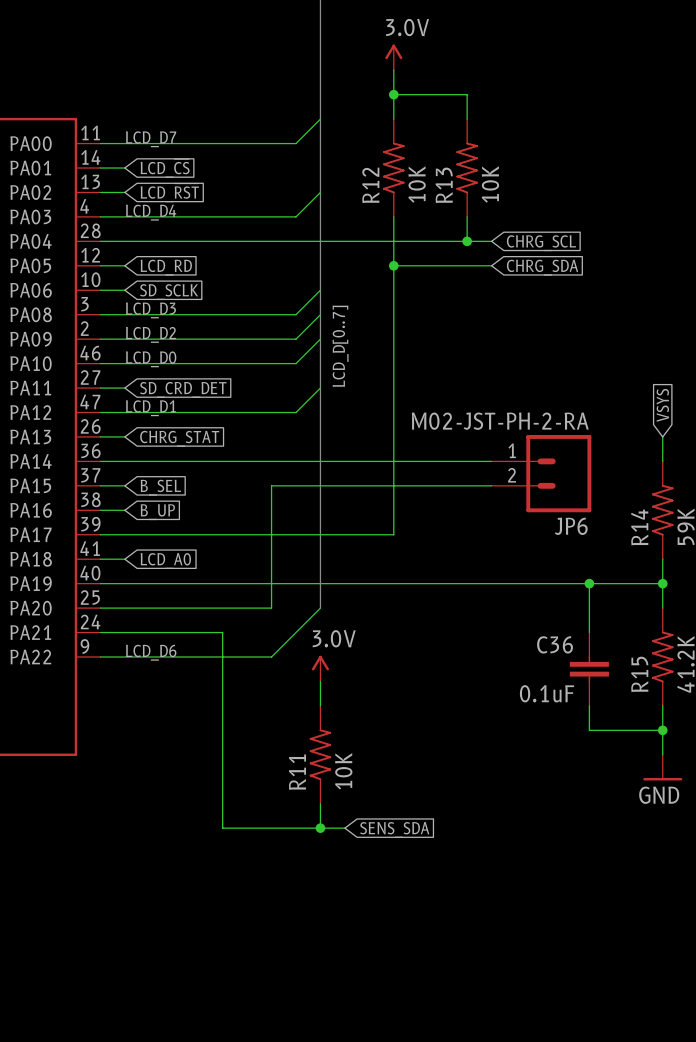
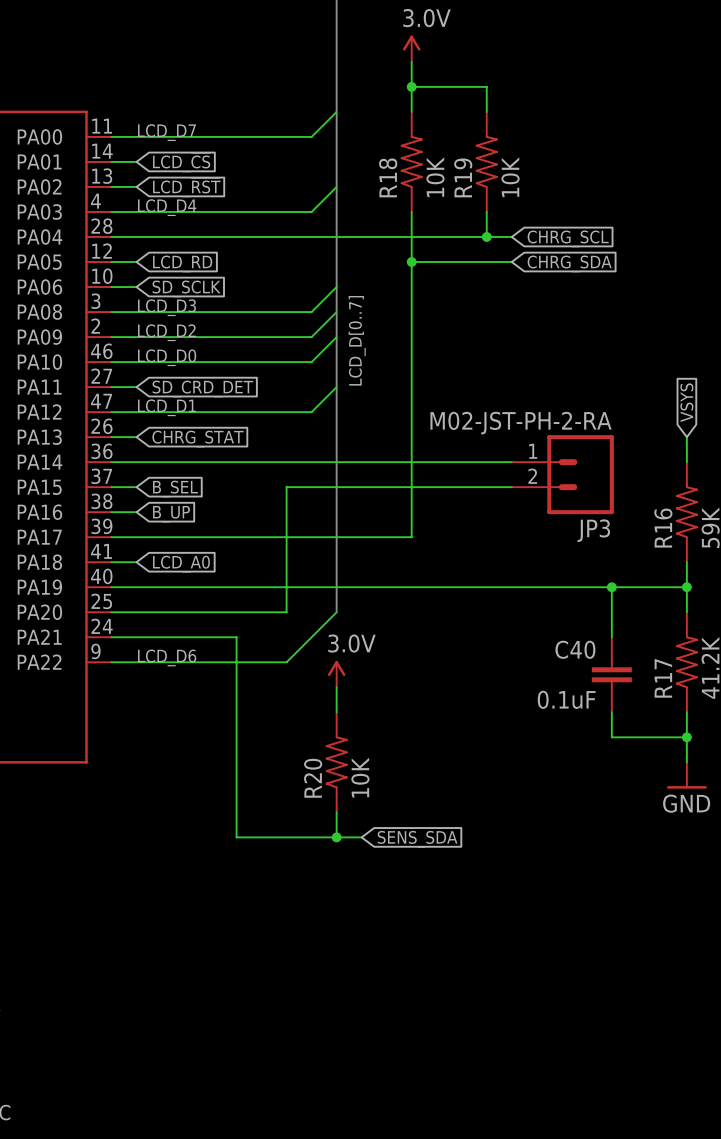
R12 name: R12 (370, 185) -> R18 (388, 177)
R13 name: R13 (444, 185) -> R19 (463, 177)
JP6 name: JP6 (571, 526) -> JP3 (593, 530)
R14 name: R14 (639, 527) -> R16 (663, 528)
C36 name: C36 (555, 644) -> C40 (575, 649)
R15 name: R15 (639, 674) -> R17 (663, 678)
R11 name: R11 (297, 772) -> R20 (313, 778)

